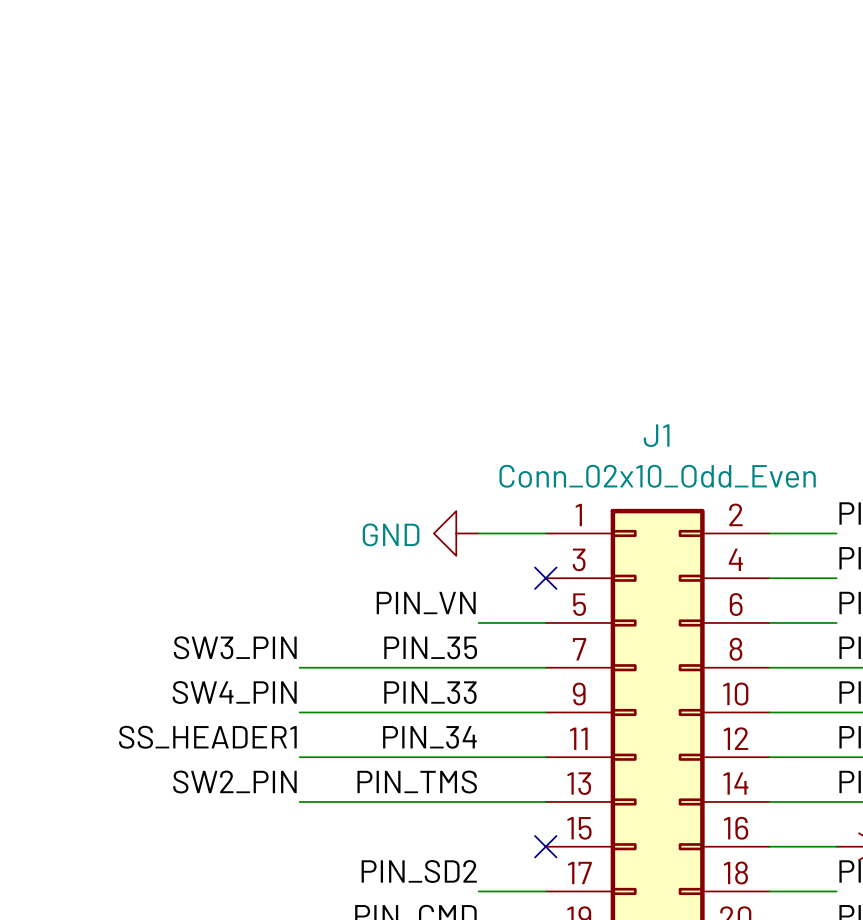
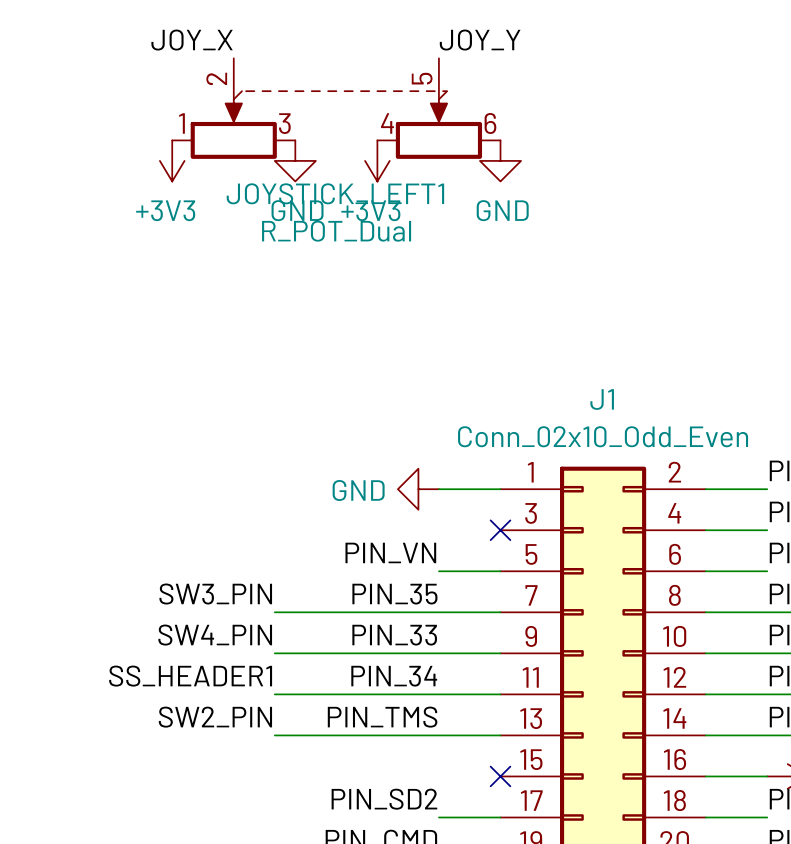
label: none -> JOY_X (192, 40)
label: none -> JOY_Y (480, 40)
JOYSTICK_LEFT1: none -> R_POT_Dual (336, 108)
power symbol: none -> +3V3 (172, 160)
power symbol: none -> GND (295, 160)
power symbol: none -> +3V3 (377, 160)
power symbol: none -> GND (500, 160)

